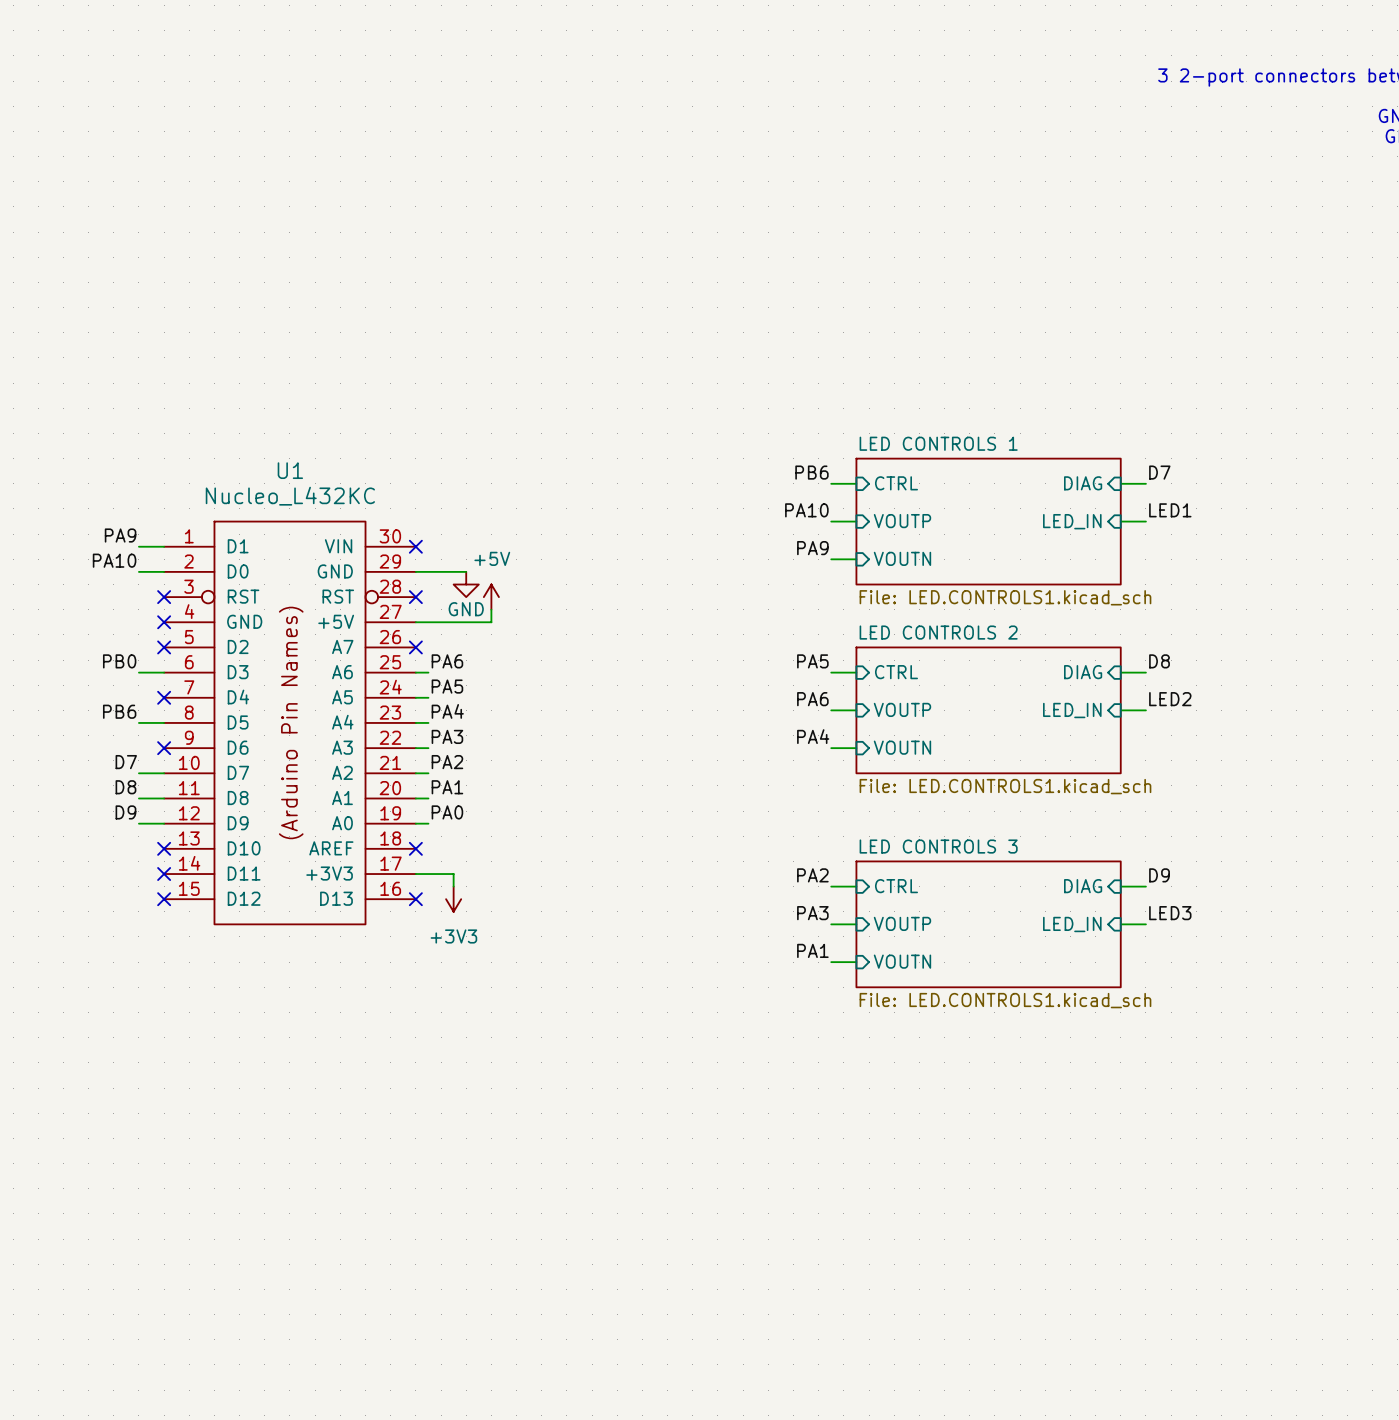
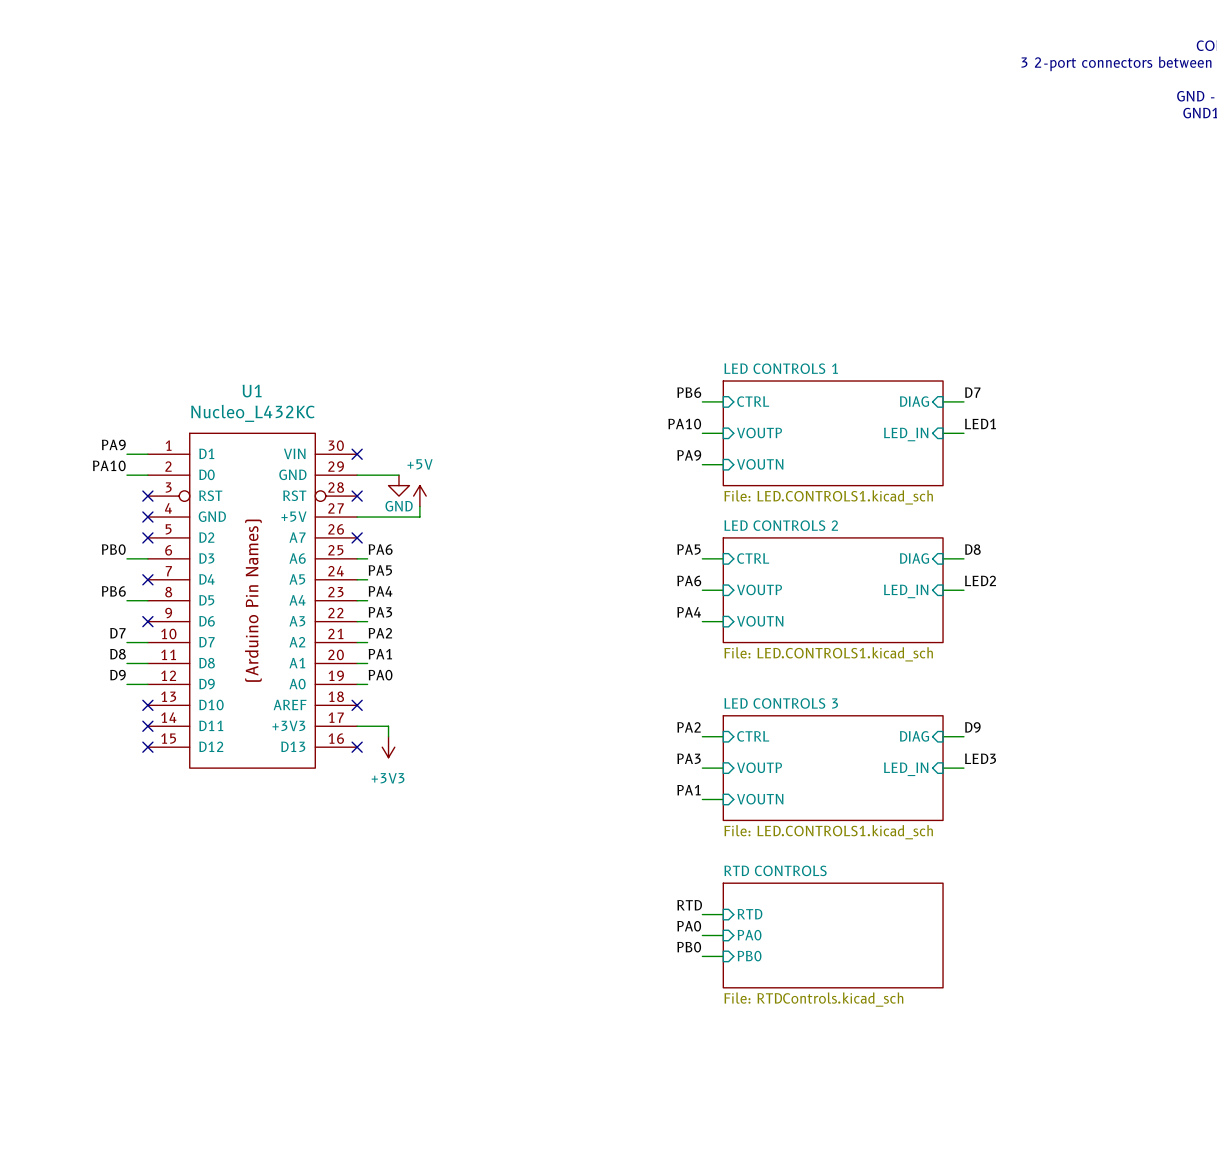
label: none -> RTD (689, 905)
wire: none -> (702, 914) (723, 914)
sheet pin: none -> RTD (750, 914)
label: none -> PA0 (689, 926)
wire: none -> (702, 935) (723, 935)
sheet pin: none -> PA0 (749, 935)
sheet RTD CONTROLS: none -> File: RTDControls.kicad_sch (833, 935)
label: none -> PB0 (689, 947)
wire: none -> (702, 956) (723, 956)
sheet pin: none -> PB0 (749, 956)

